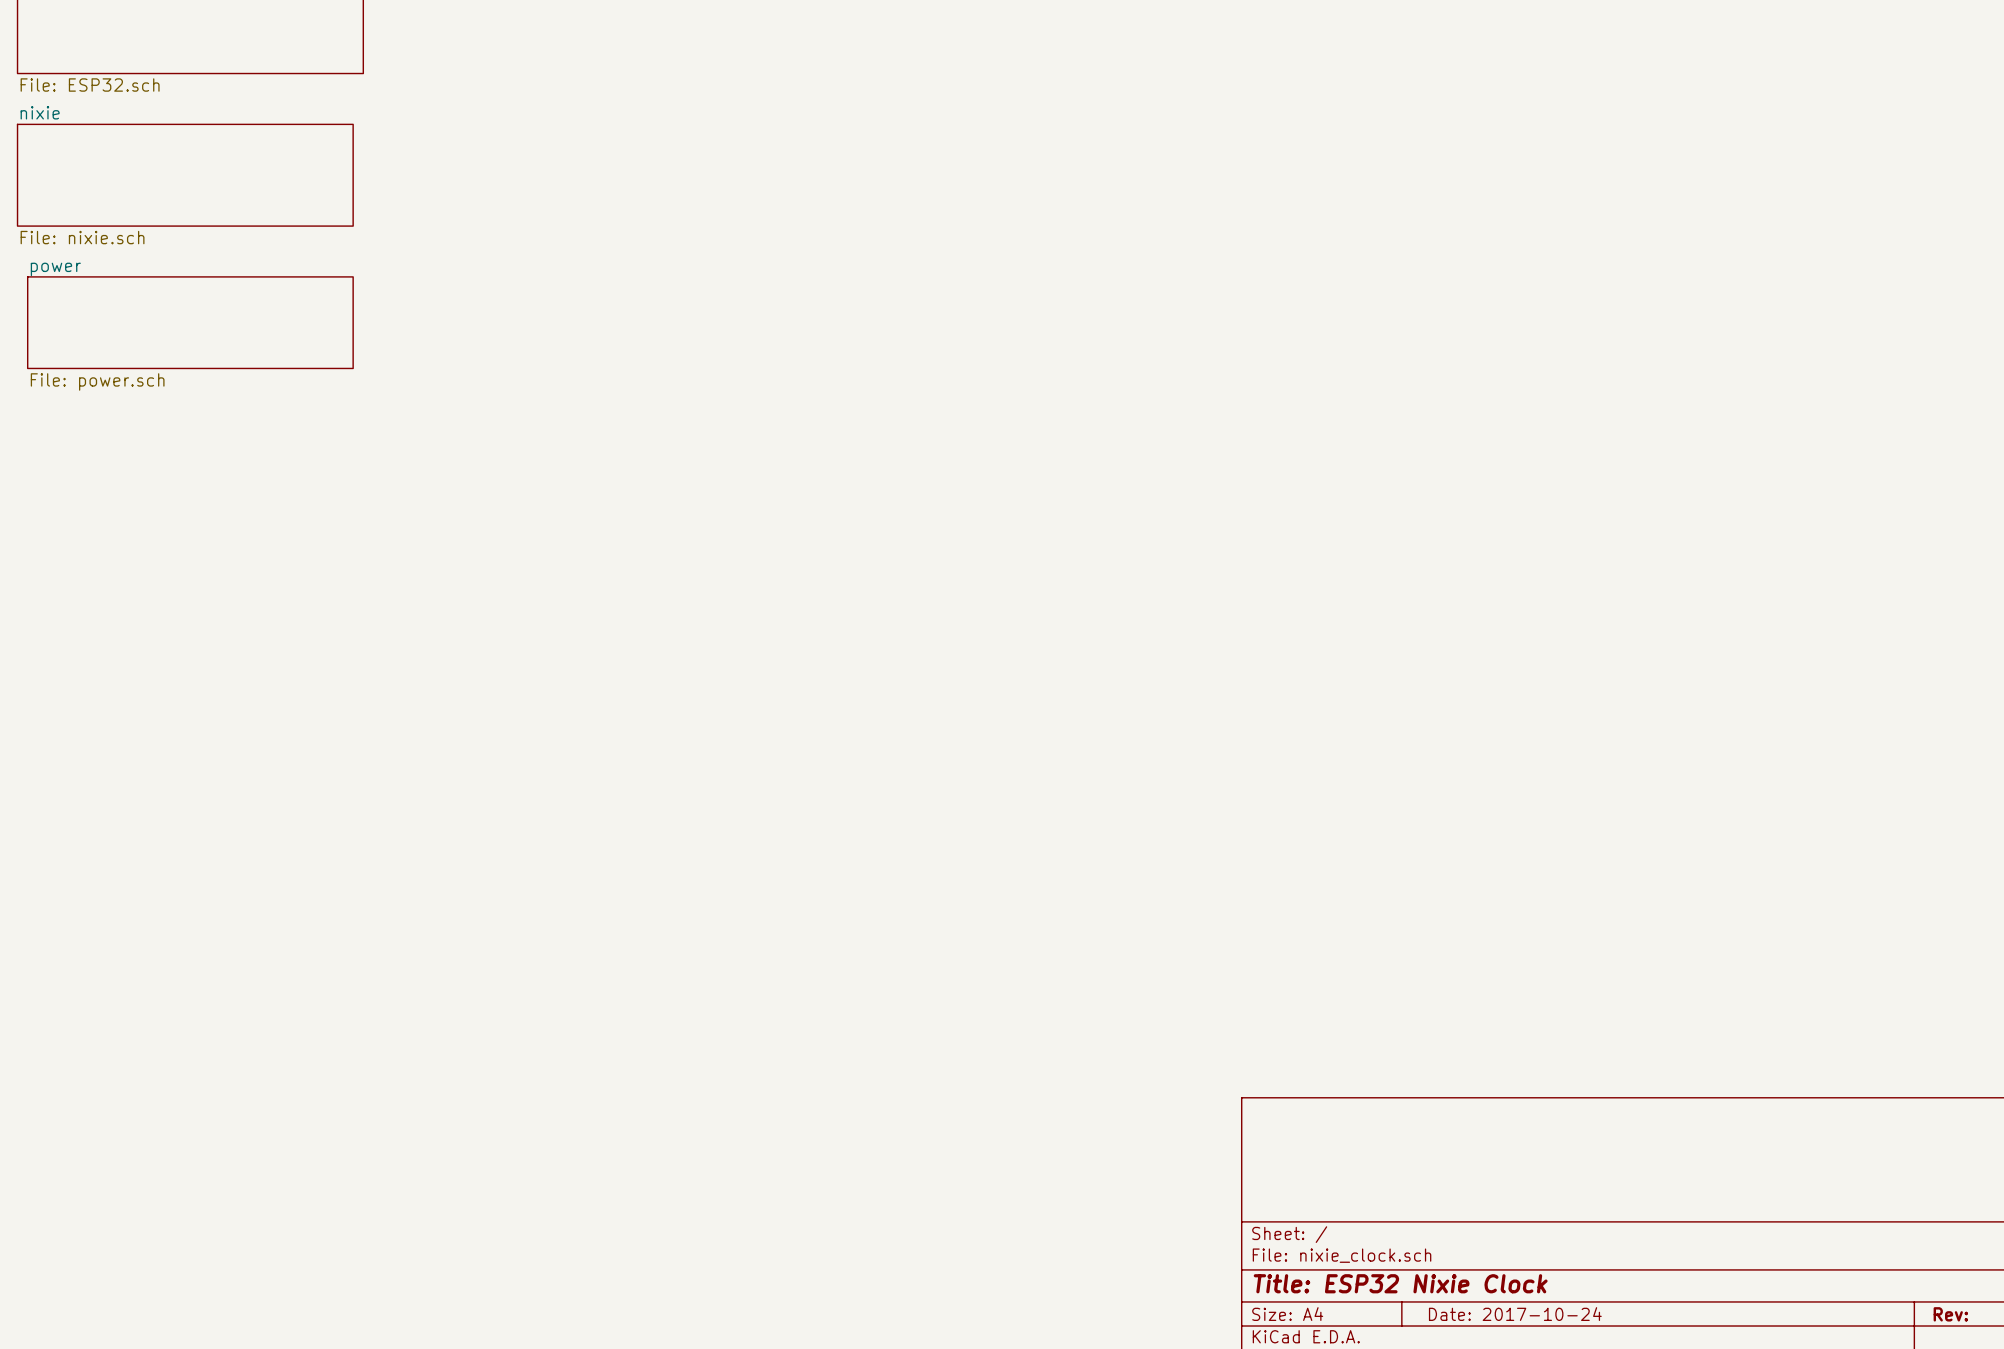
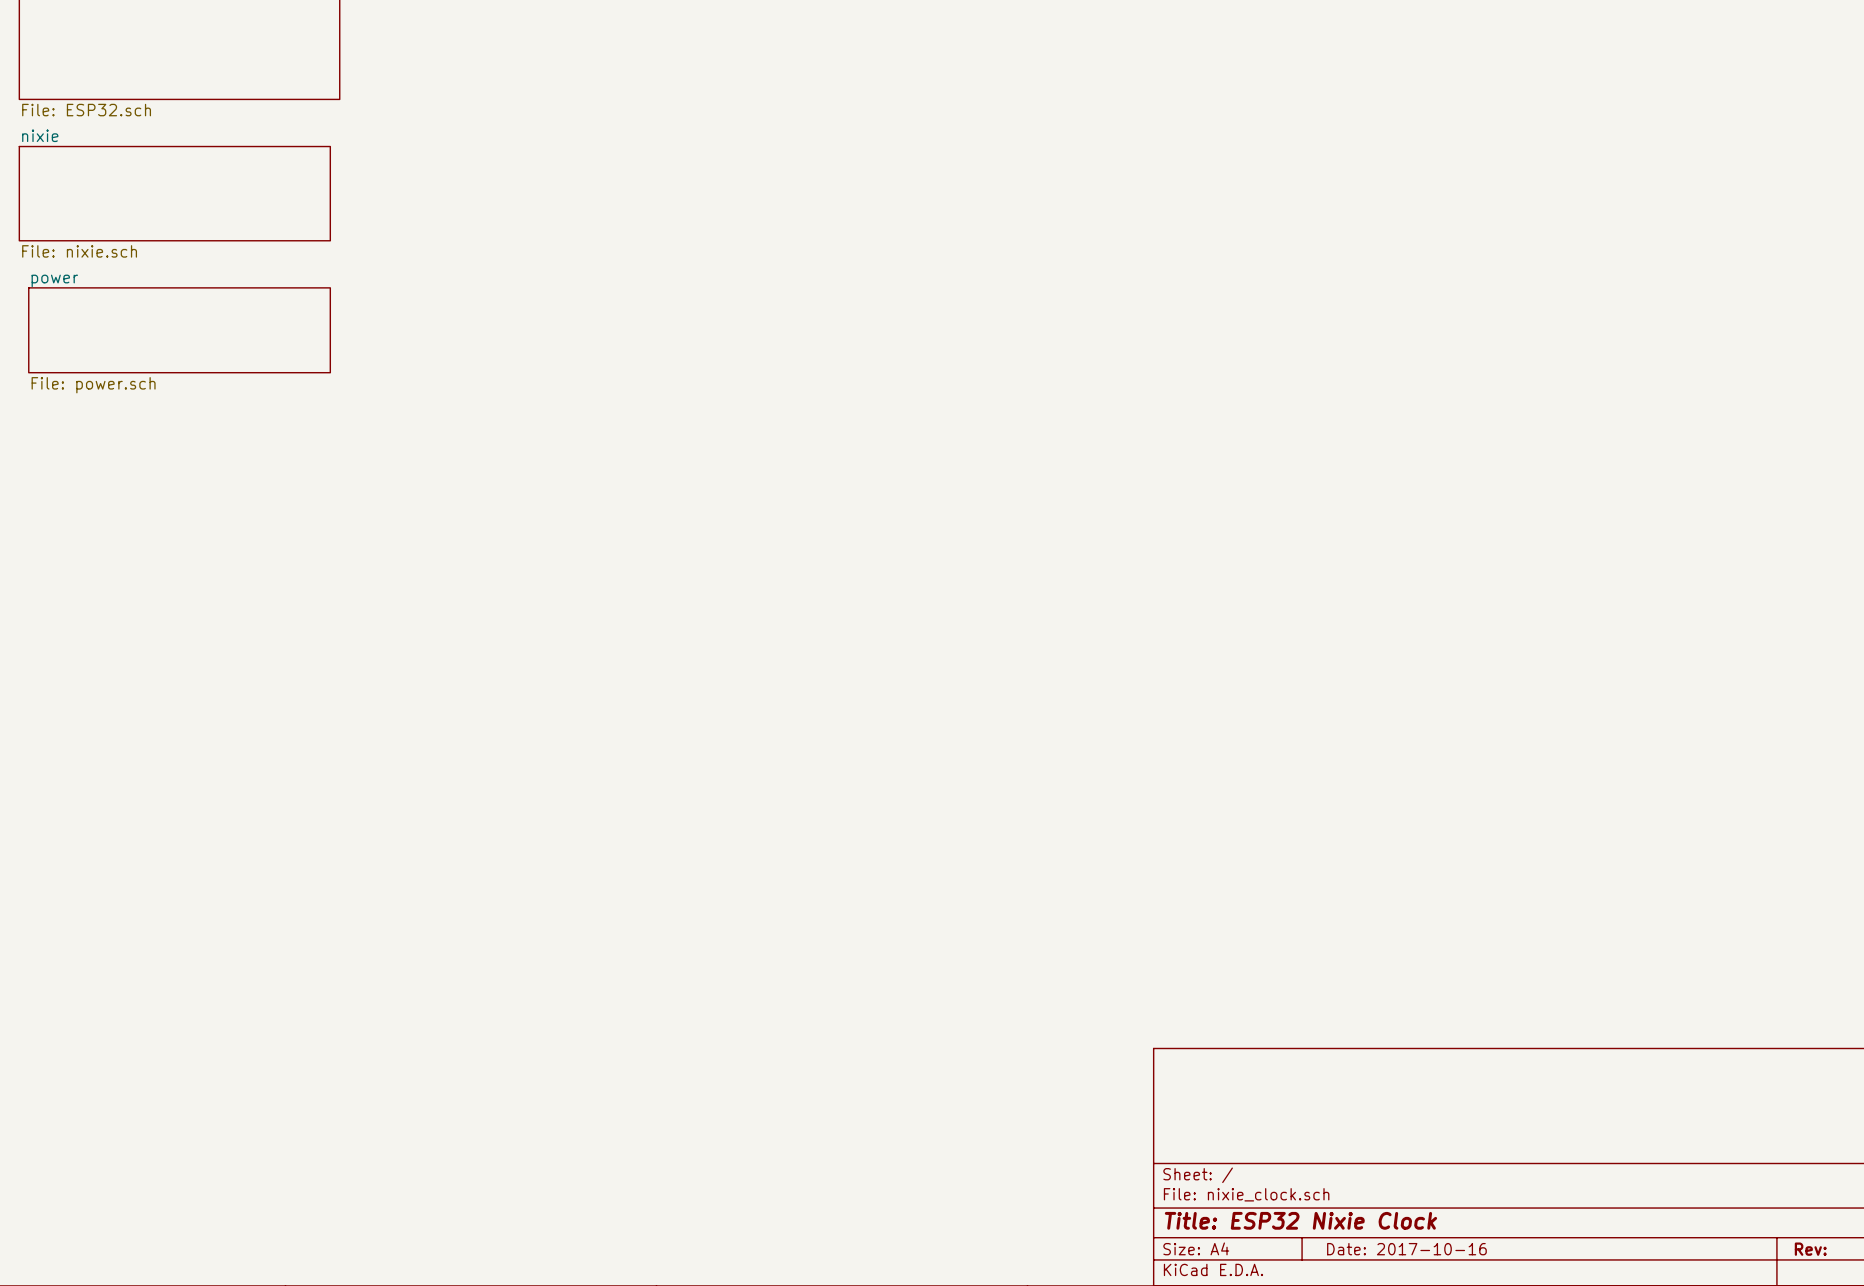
title block: Date: 2017-10-24 (1515, 1314) -> Date: 2017-10-16 (1406, 1249)

